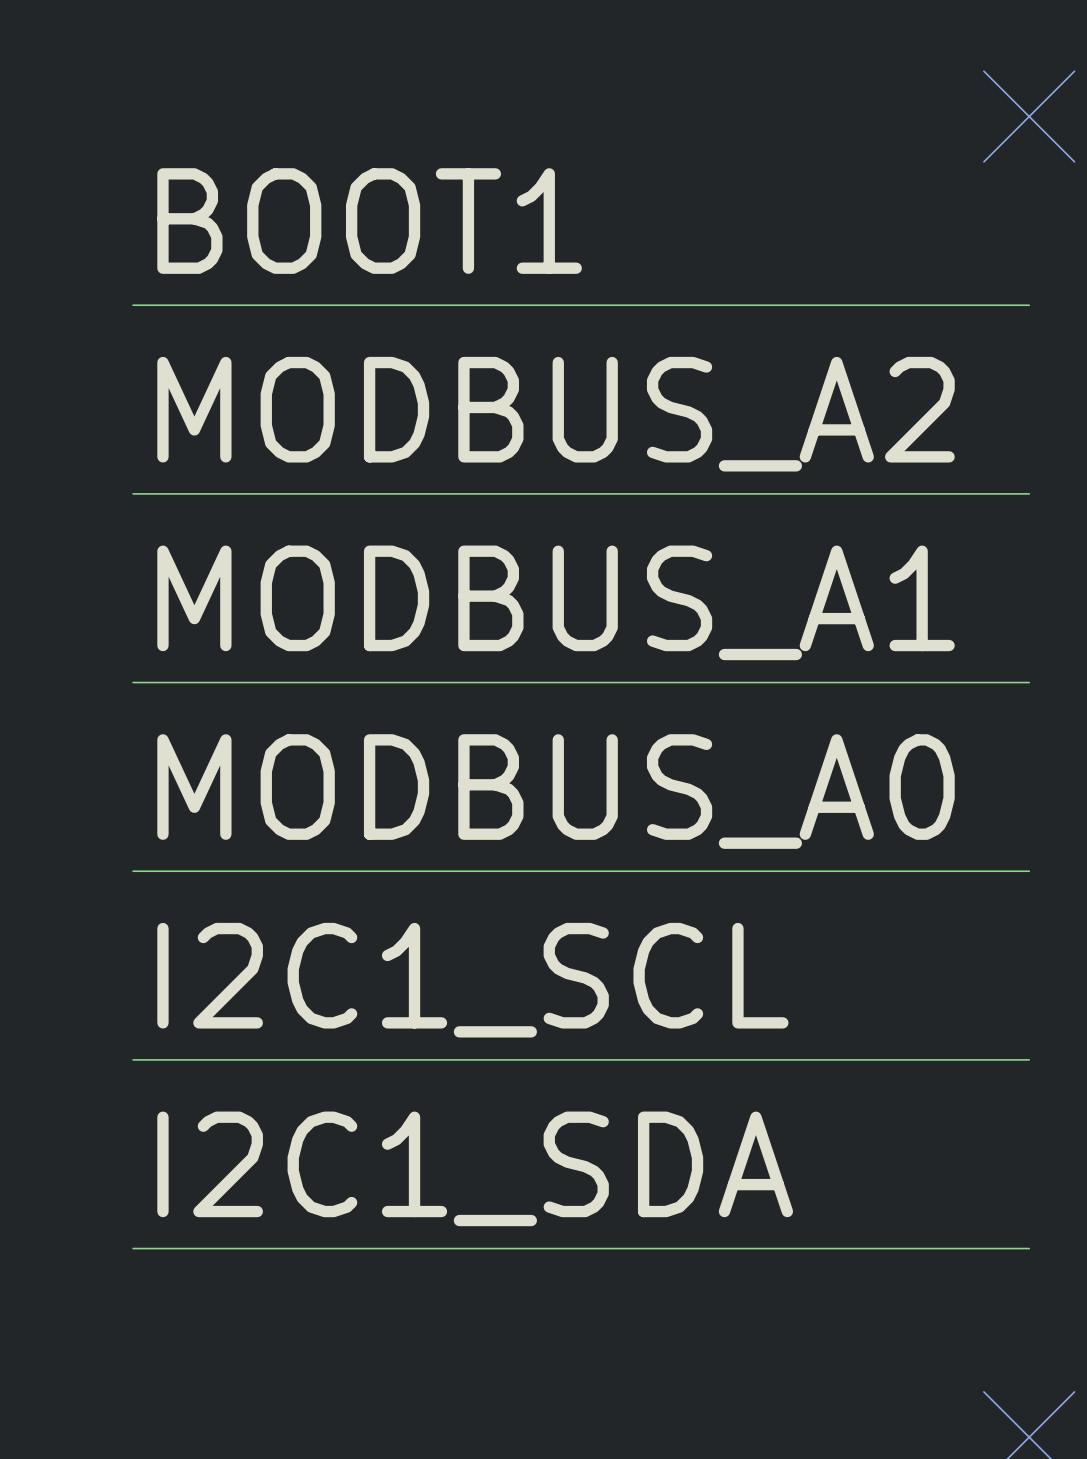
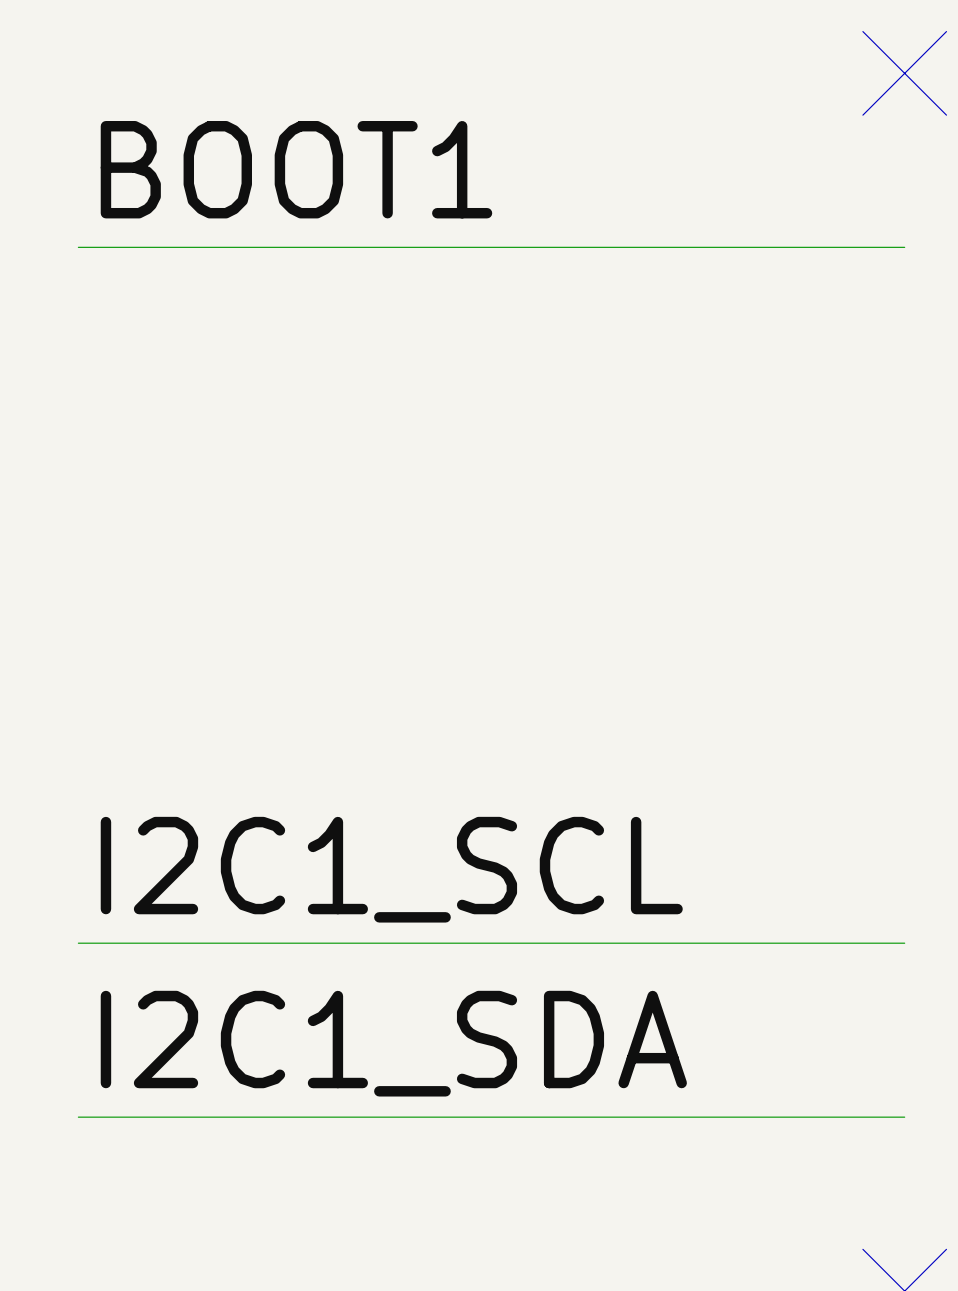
label: MODBUS_A2 (556, 414) -> none
wire: (133, 493) (1029, 493) -> none
label: MODBUS_A1 (556, 602) -> none
wire: (133, 682) (1029, 682) -> none
label: MODBUS_A0 (556, 791) -> none
wire: (133, 871) (1029, 871) -> none

